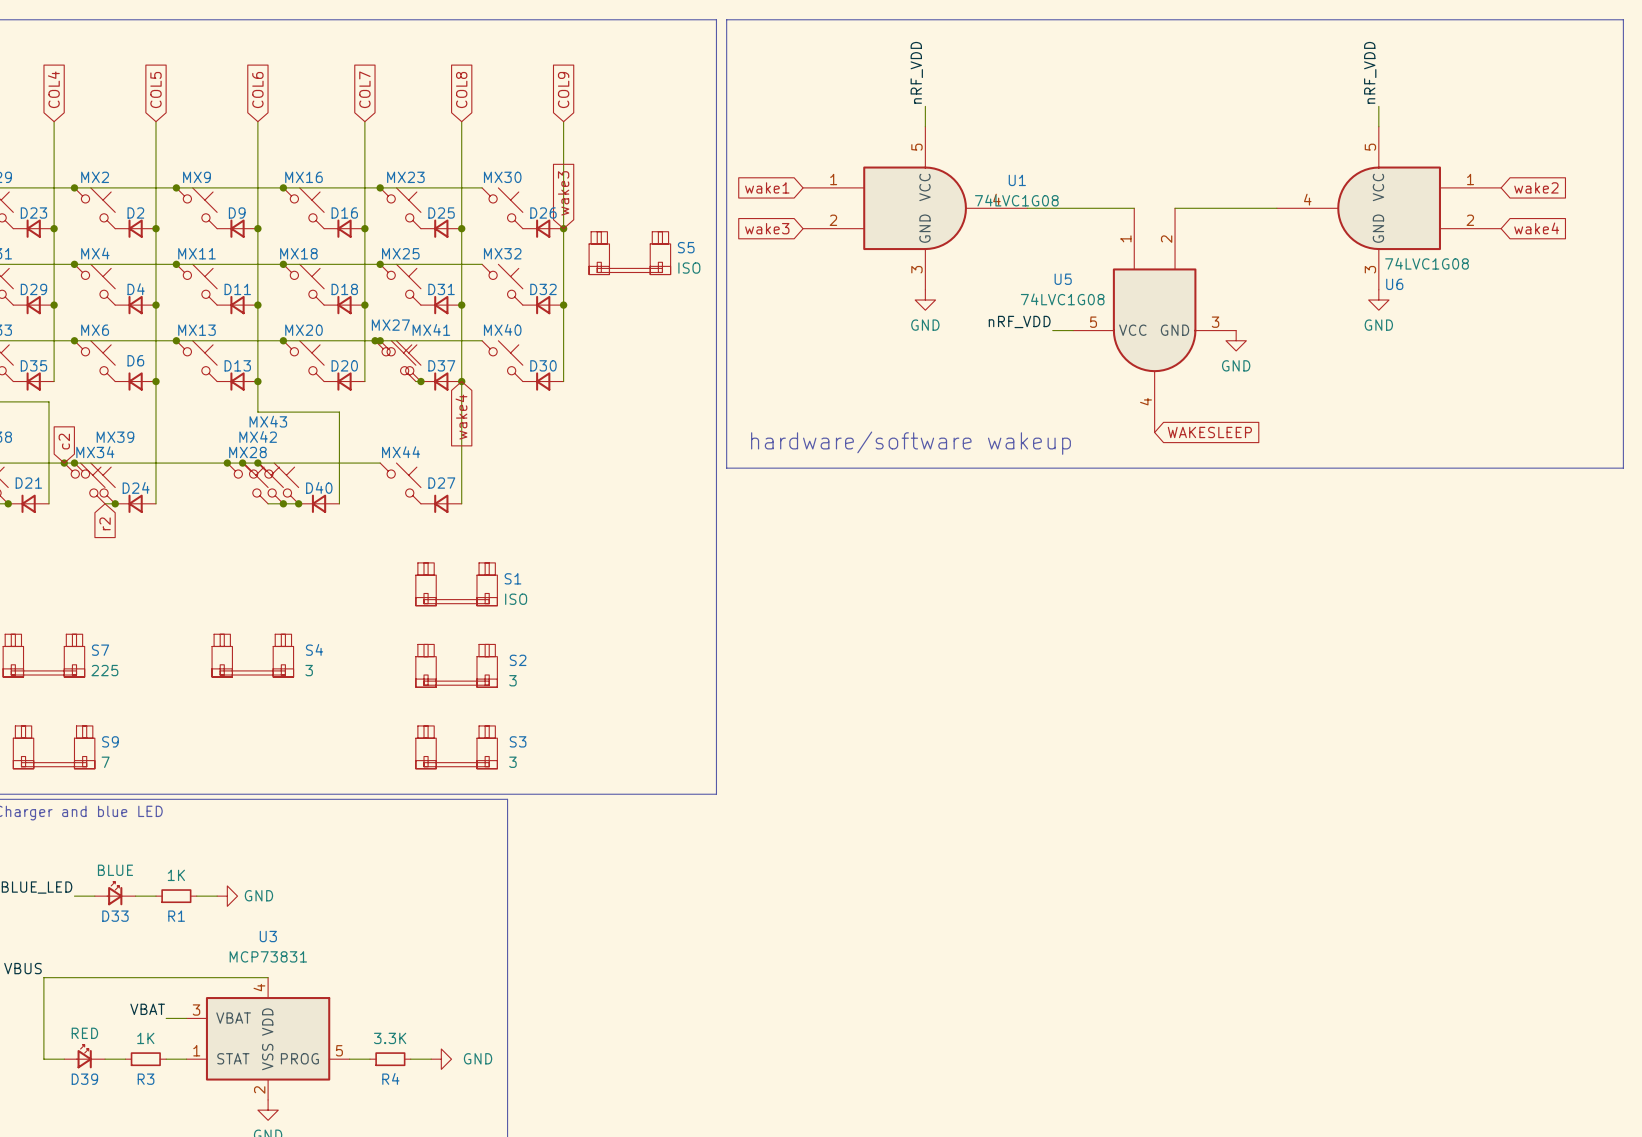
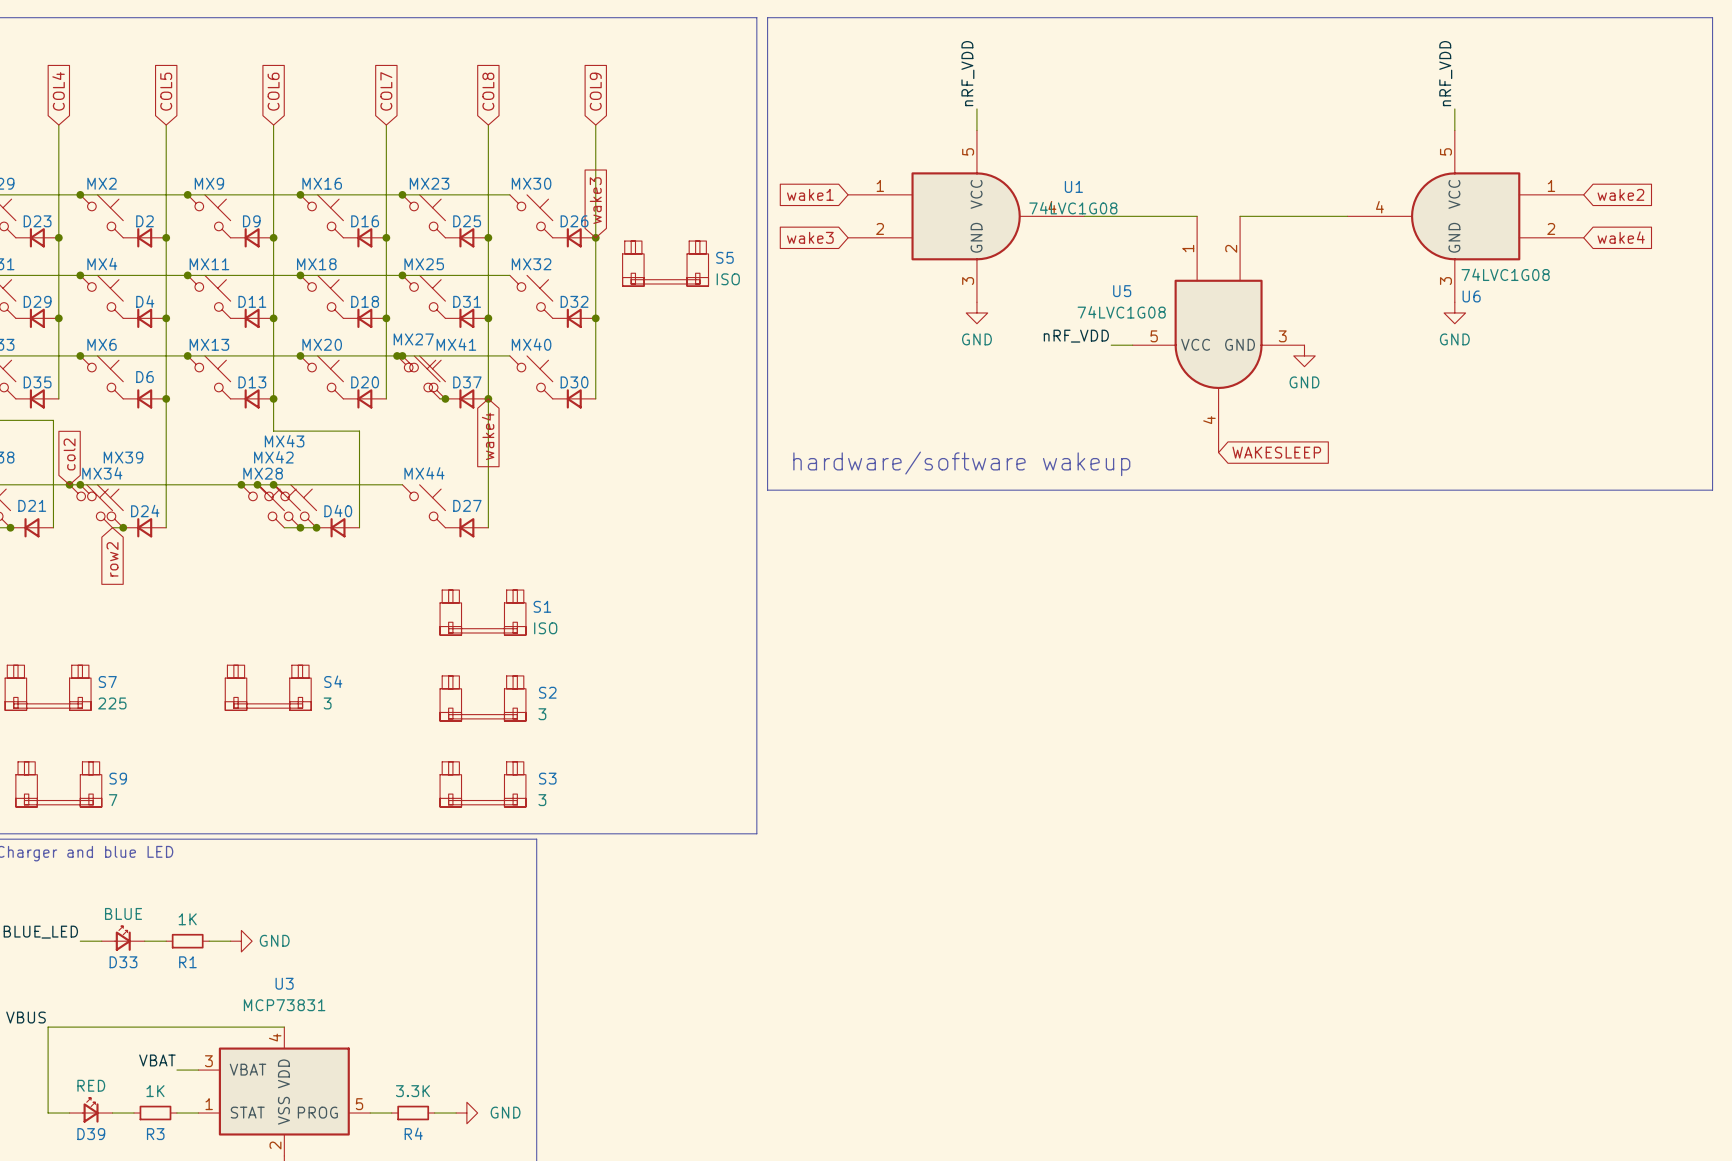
global label: c2 (64, 441) -> col2 (69, 454)
global label: r2 (105, 523) -> row2 (112, 559)

